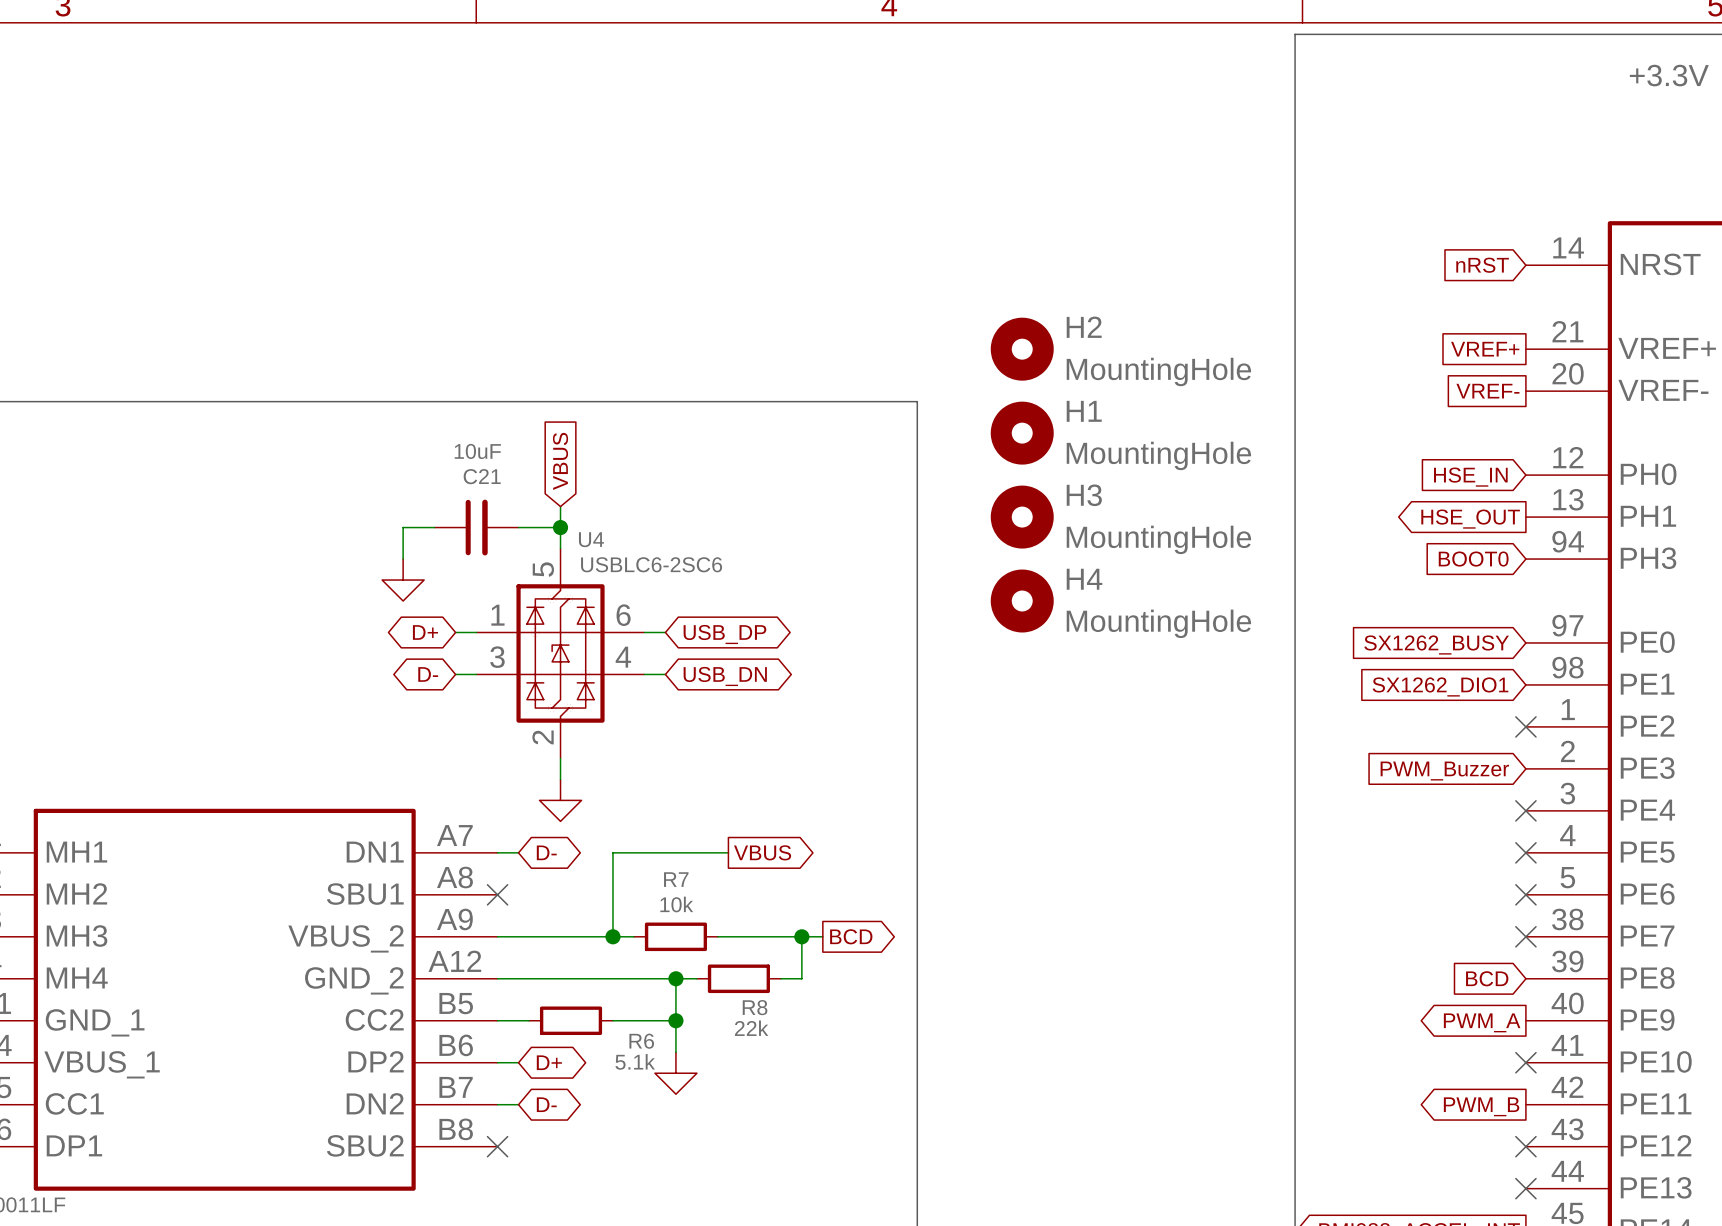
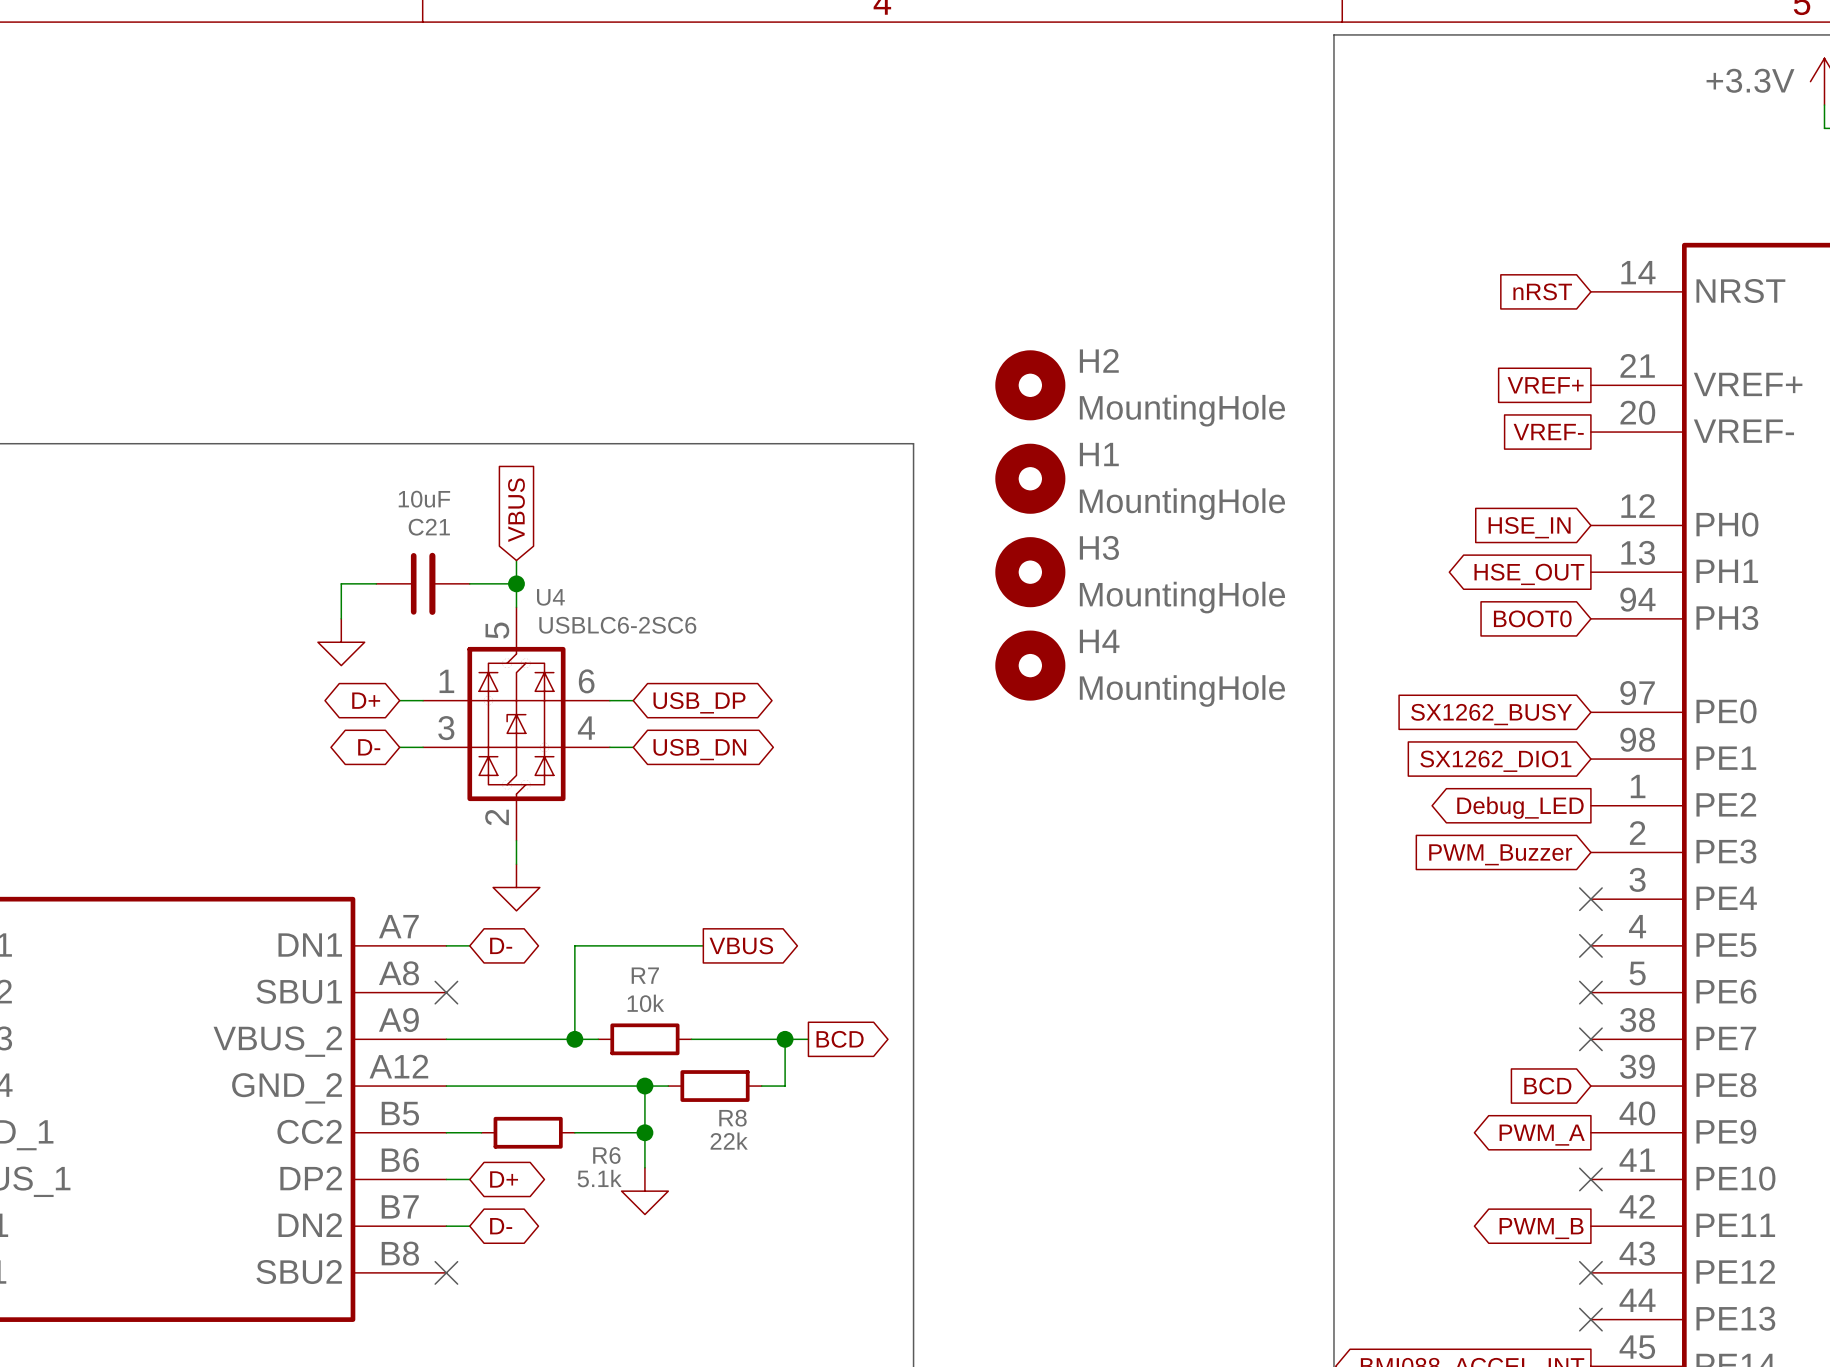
no-connect mark: (1525, 726) -> none
global label: none -> Debug_LED (1520, 807)

